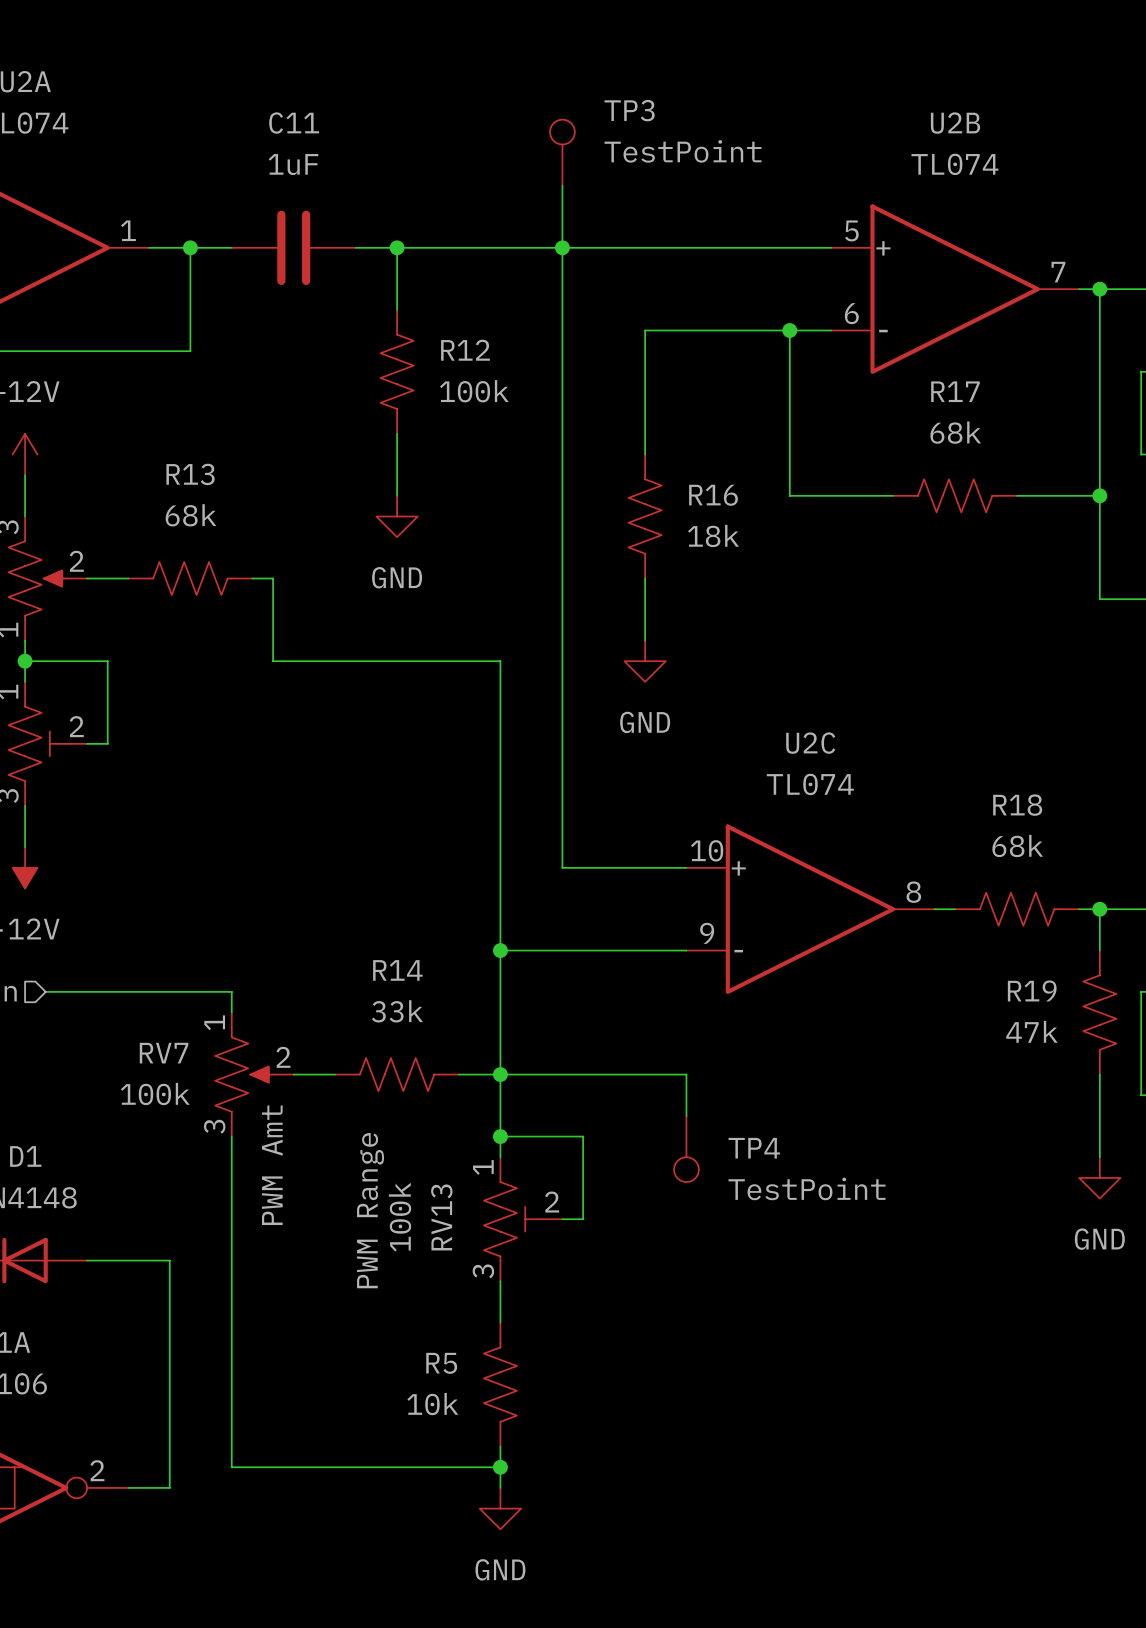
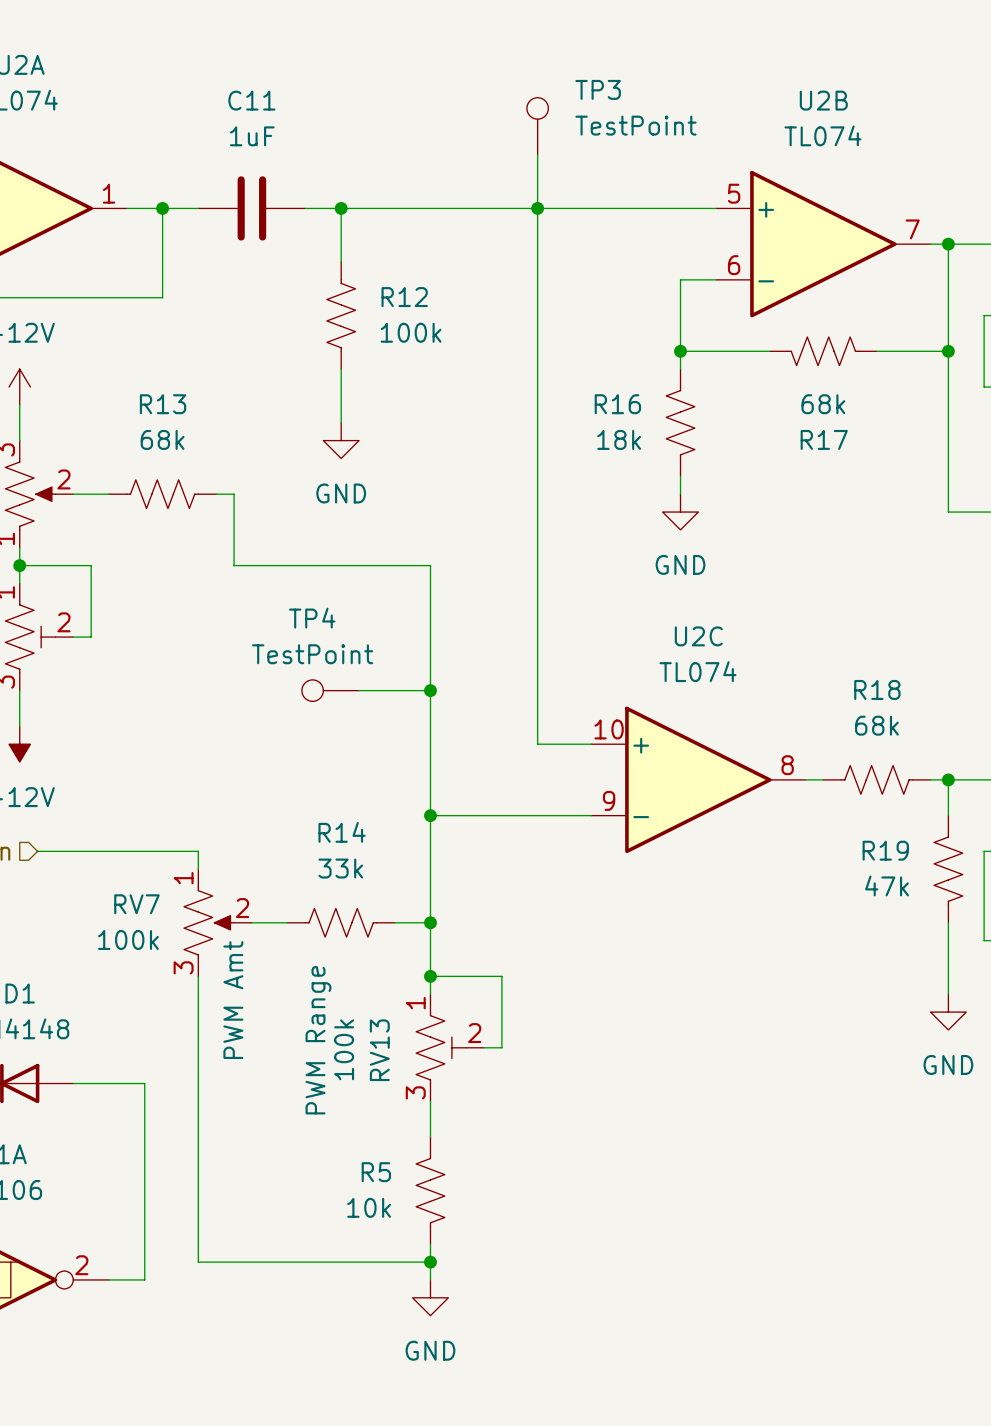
TP3 position: (562, 152) -> (537, 126)
wire: (562, 185) (562, 867) (624, 867) -> (537, 154) (537, 744)
junction position: (562, 247) -> (537, 208)
wire: (789, 330) (645, 330) (645, 454) -> none
junction position: (789, 330) -> (680, 351)
R17 name position: R17 (955, 391) -> R17 (824, 439)
wire: none -> (680, 351) (769, 351)
R17 value position: 68k (955, 432) -> 68k (823, 404)
wire: (789, 433) (789, 495) (893, 495) -> none
R17 flip: as is (955, 495) -> left-right (823, 351)
R17 position: (955, 495) -> (823, 351)
wire: (1017, 495) (1099, 495) -> (876, 351) (948, 351)
junction position: (1099, 495) -> (948, 351)
R16 flip: as is (645, 516) -> left-right (680, 422)
R16 position: (645, 516) -> (680, 422)
wire: none -> (680, 476) (680, 494)
wire: (645, 578) (645, 640) -> none
power symbol position: GND (645, 661) -> GND (680, 512)
wire: none -> (359, 690) (430, 690)
junction: none -> (430, 690)
wire: (500, 1074) (686, 1074) (686, 1115) -> none
TP4 position: (686, 1148) -> (330, 690)
TP4 name position: TP4 (754, 1148) -> TP4 (312, 618)
TP4 rotation: 0° (686, 1169) -> 90° clockwise (312, 690)
TP4 value position: TestPoint (807, 1188) -> TestPoint (312, 654)

